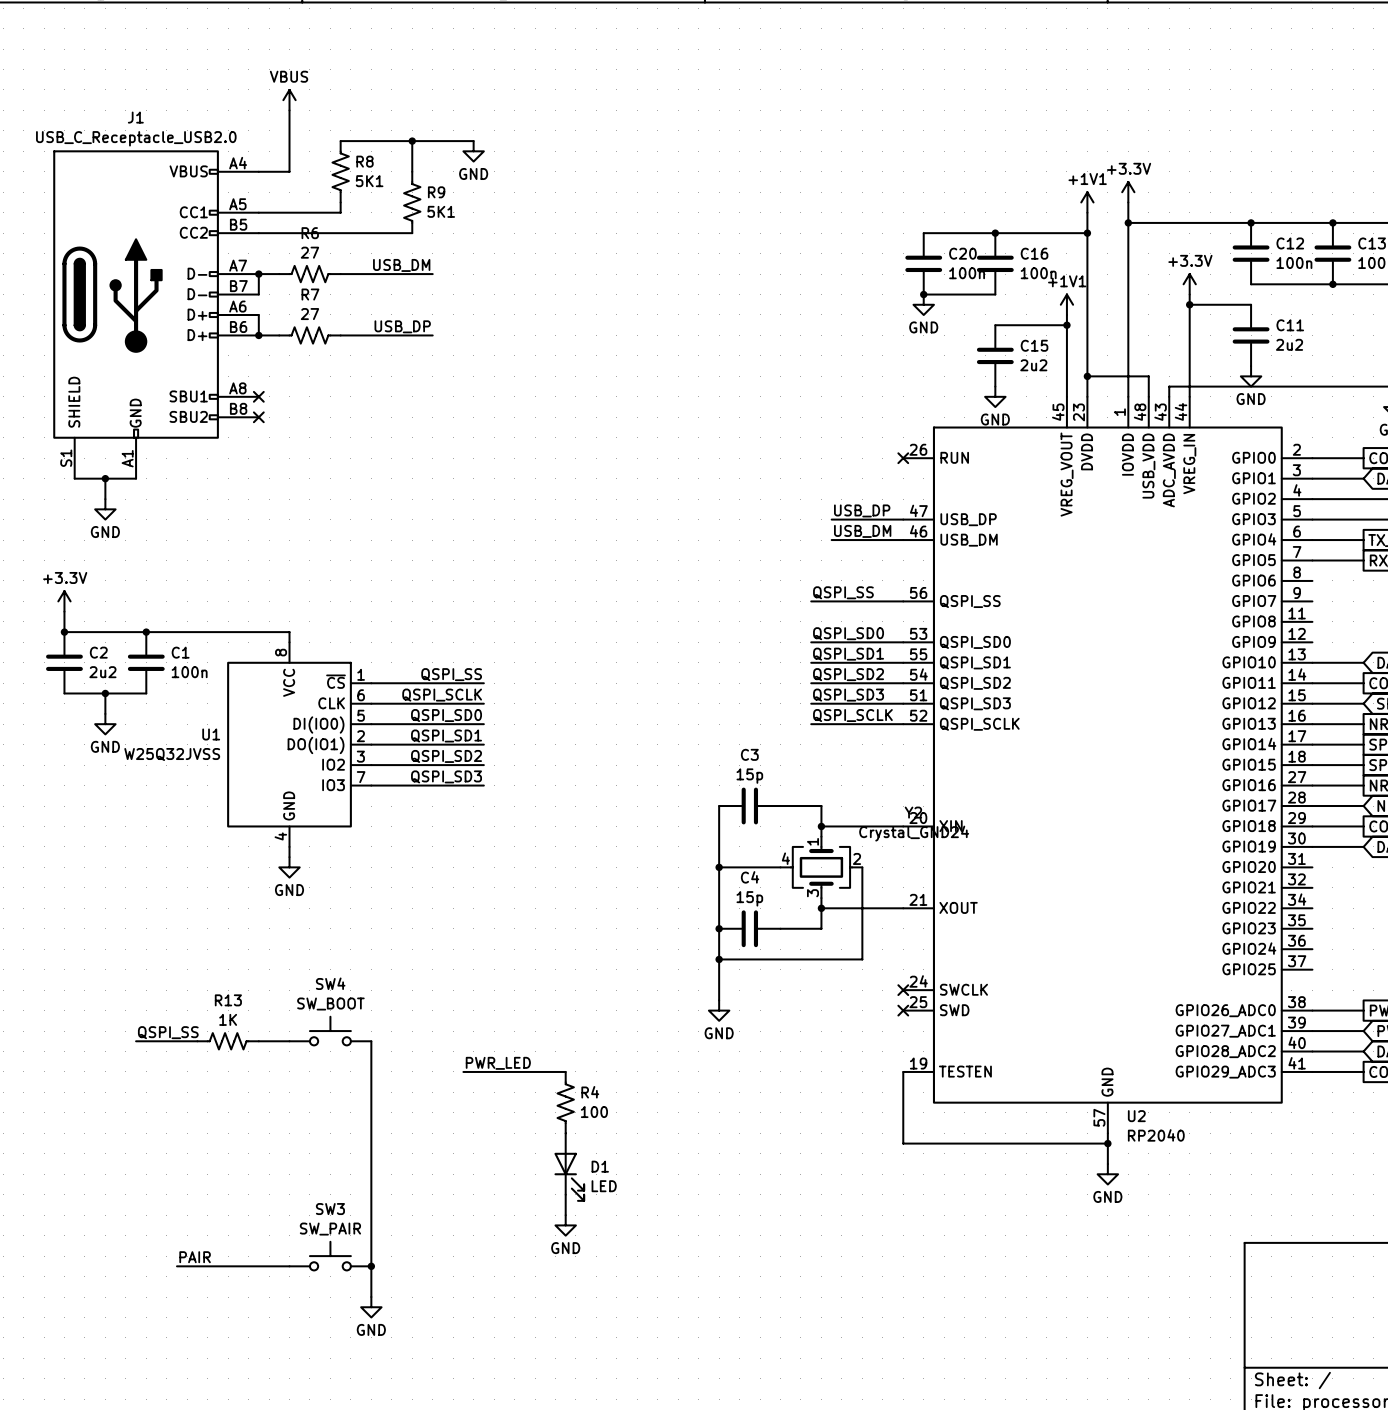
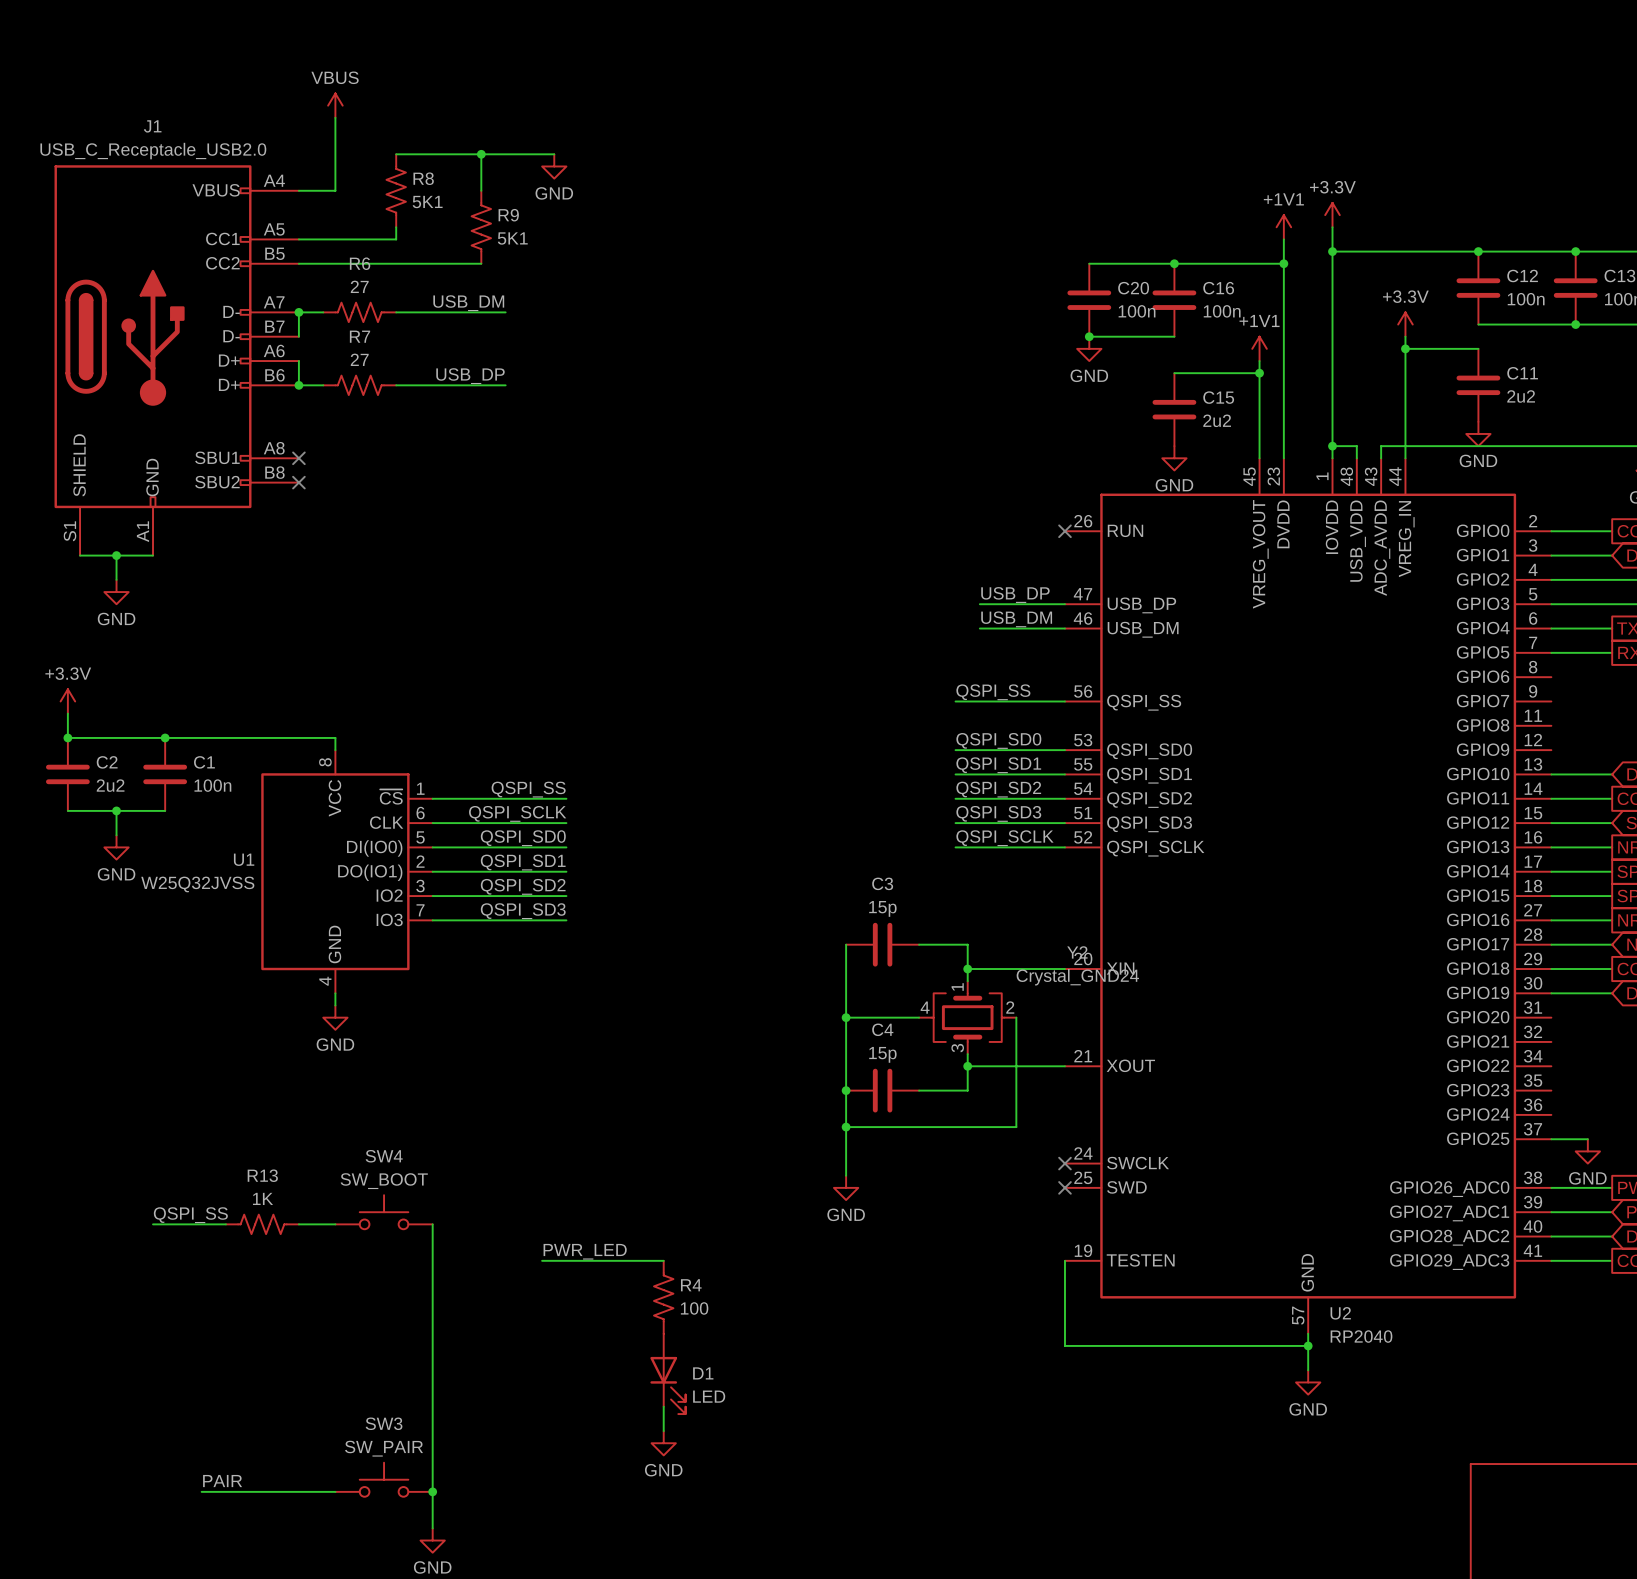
wire: (1087, 376) (1148, 376) (1148, 386) -> (1332, 446) (1356, 446)
junction position: (1087, 376) -> (1332, 446)
wire: none -> (1551, 1139) (1587, 1139)
power symbol: none -> GND (1587, 1151)

